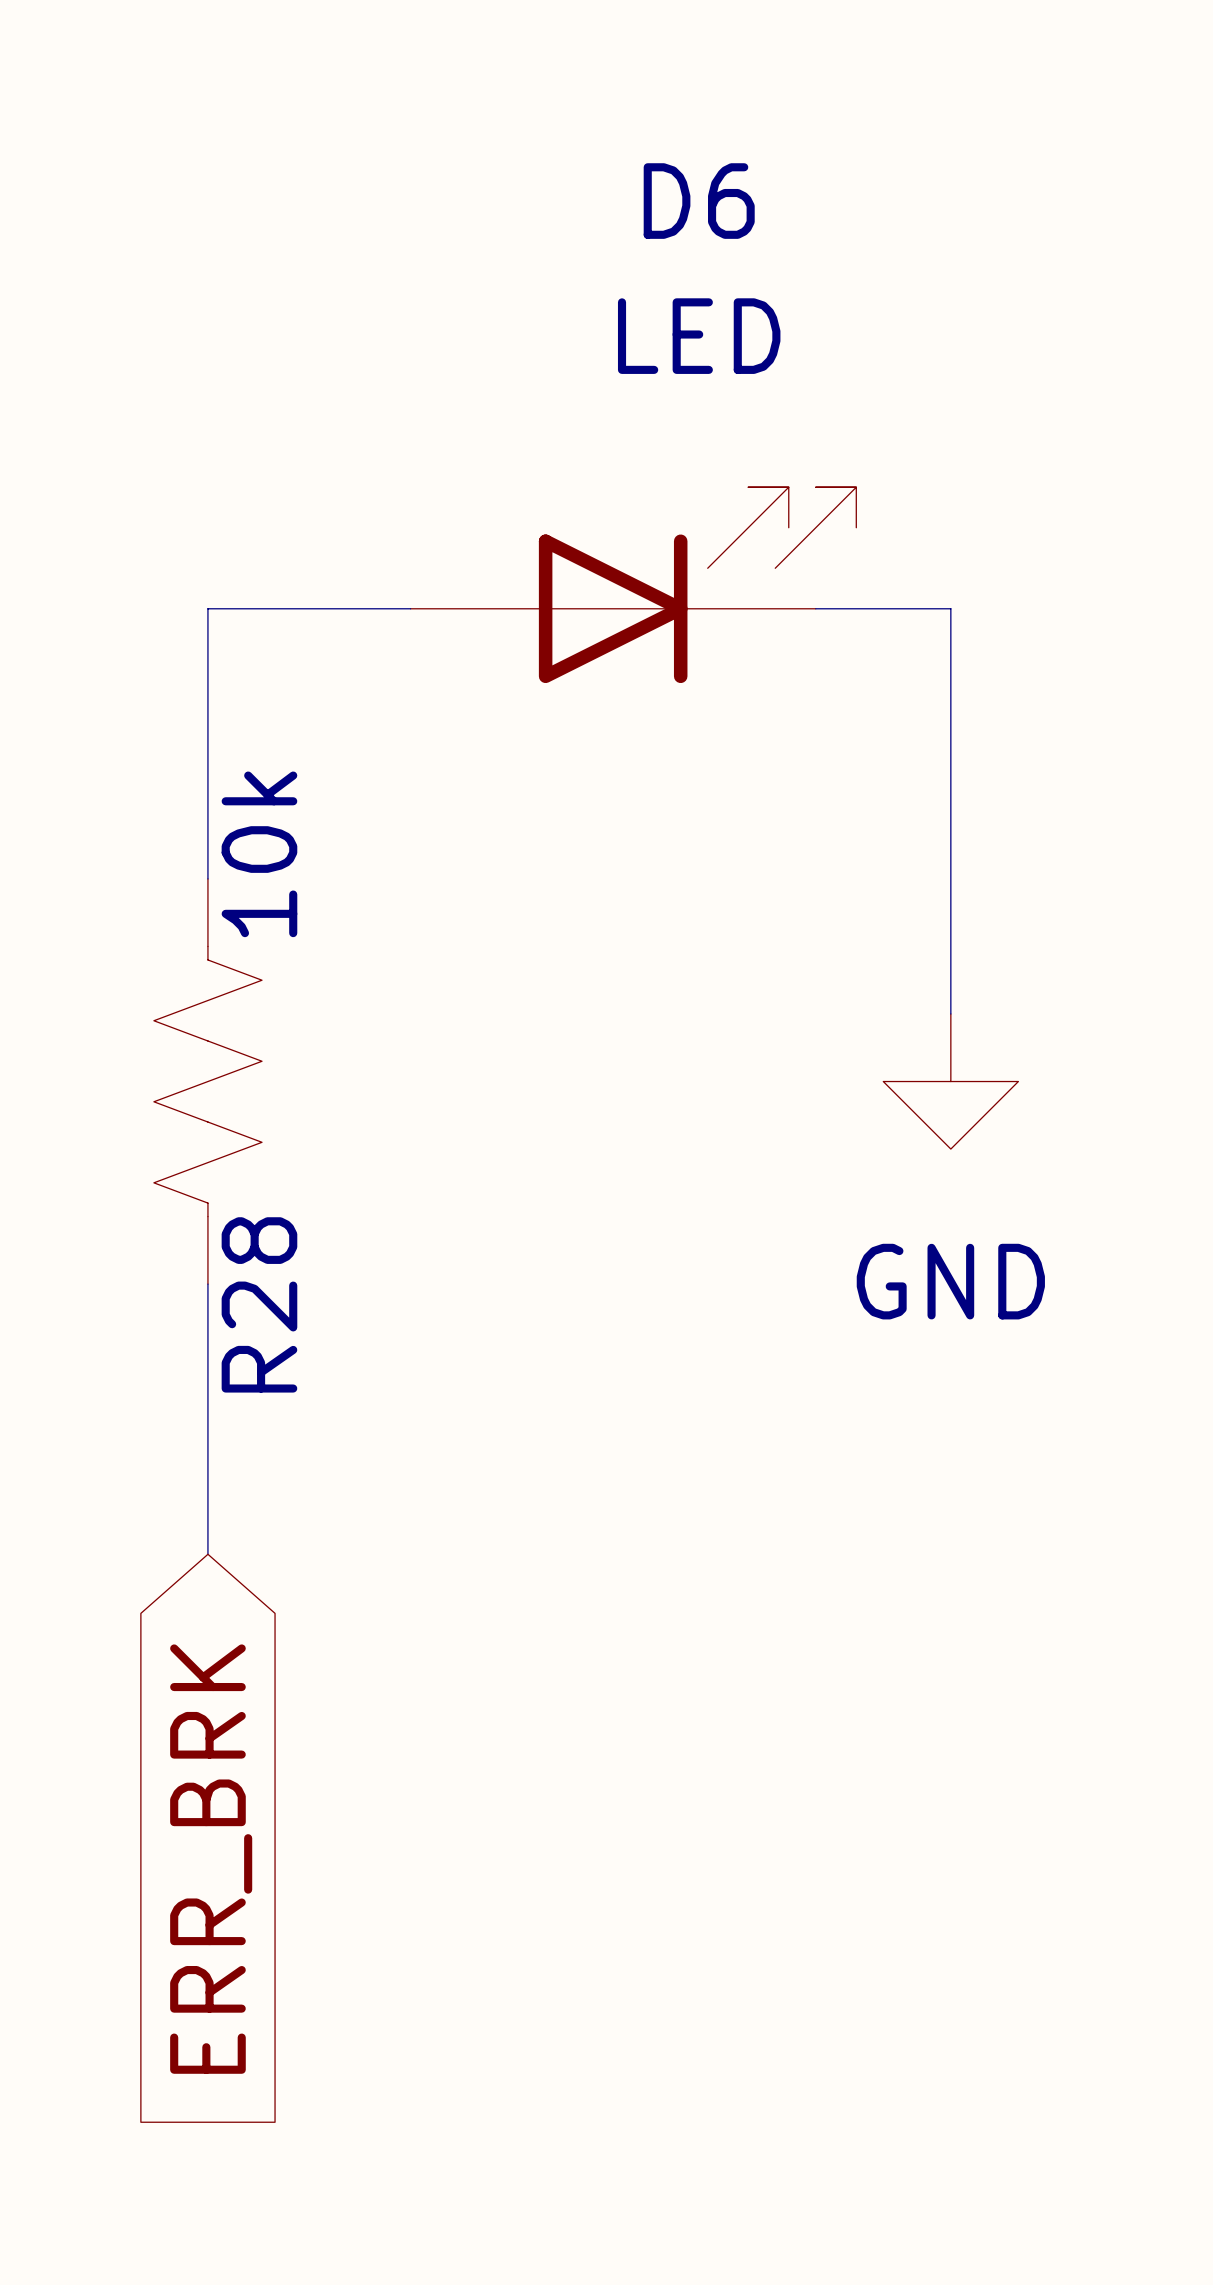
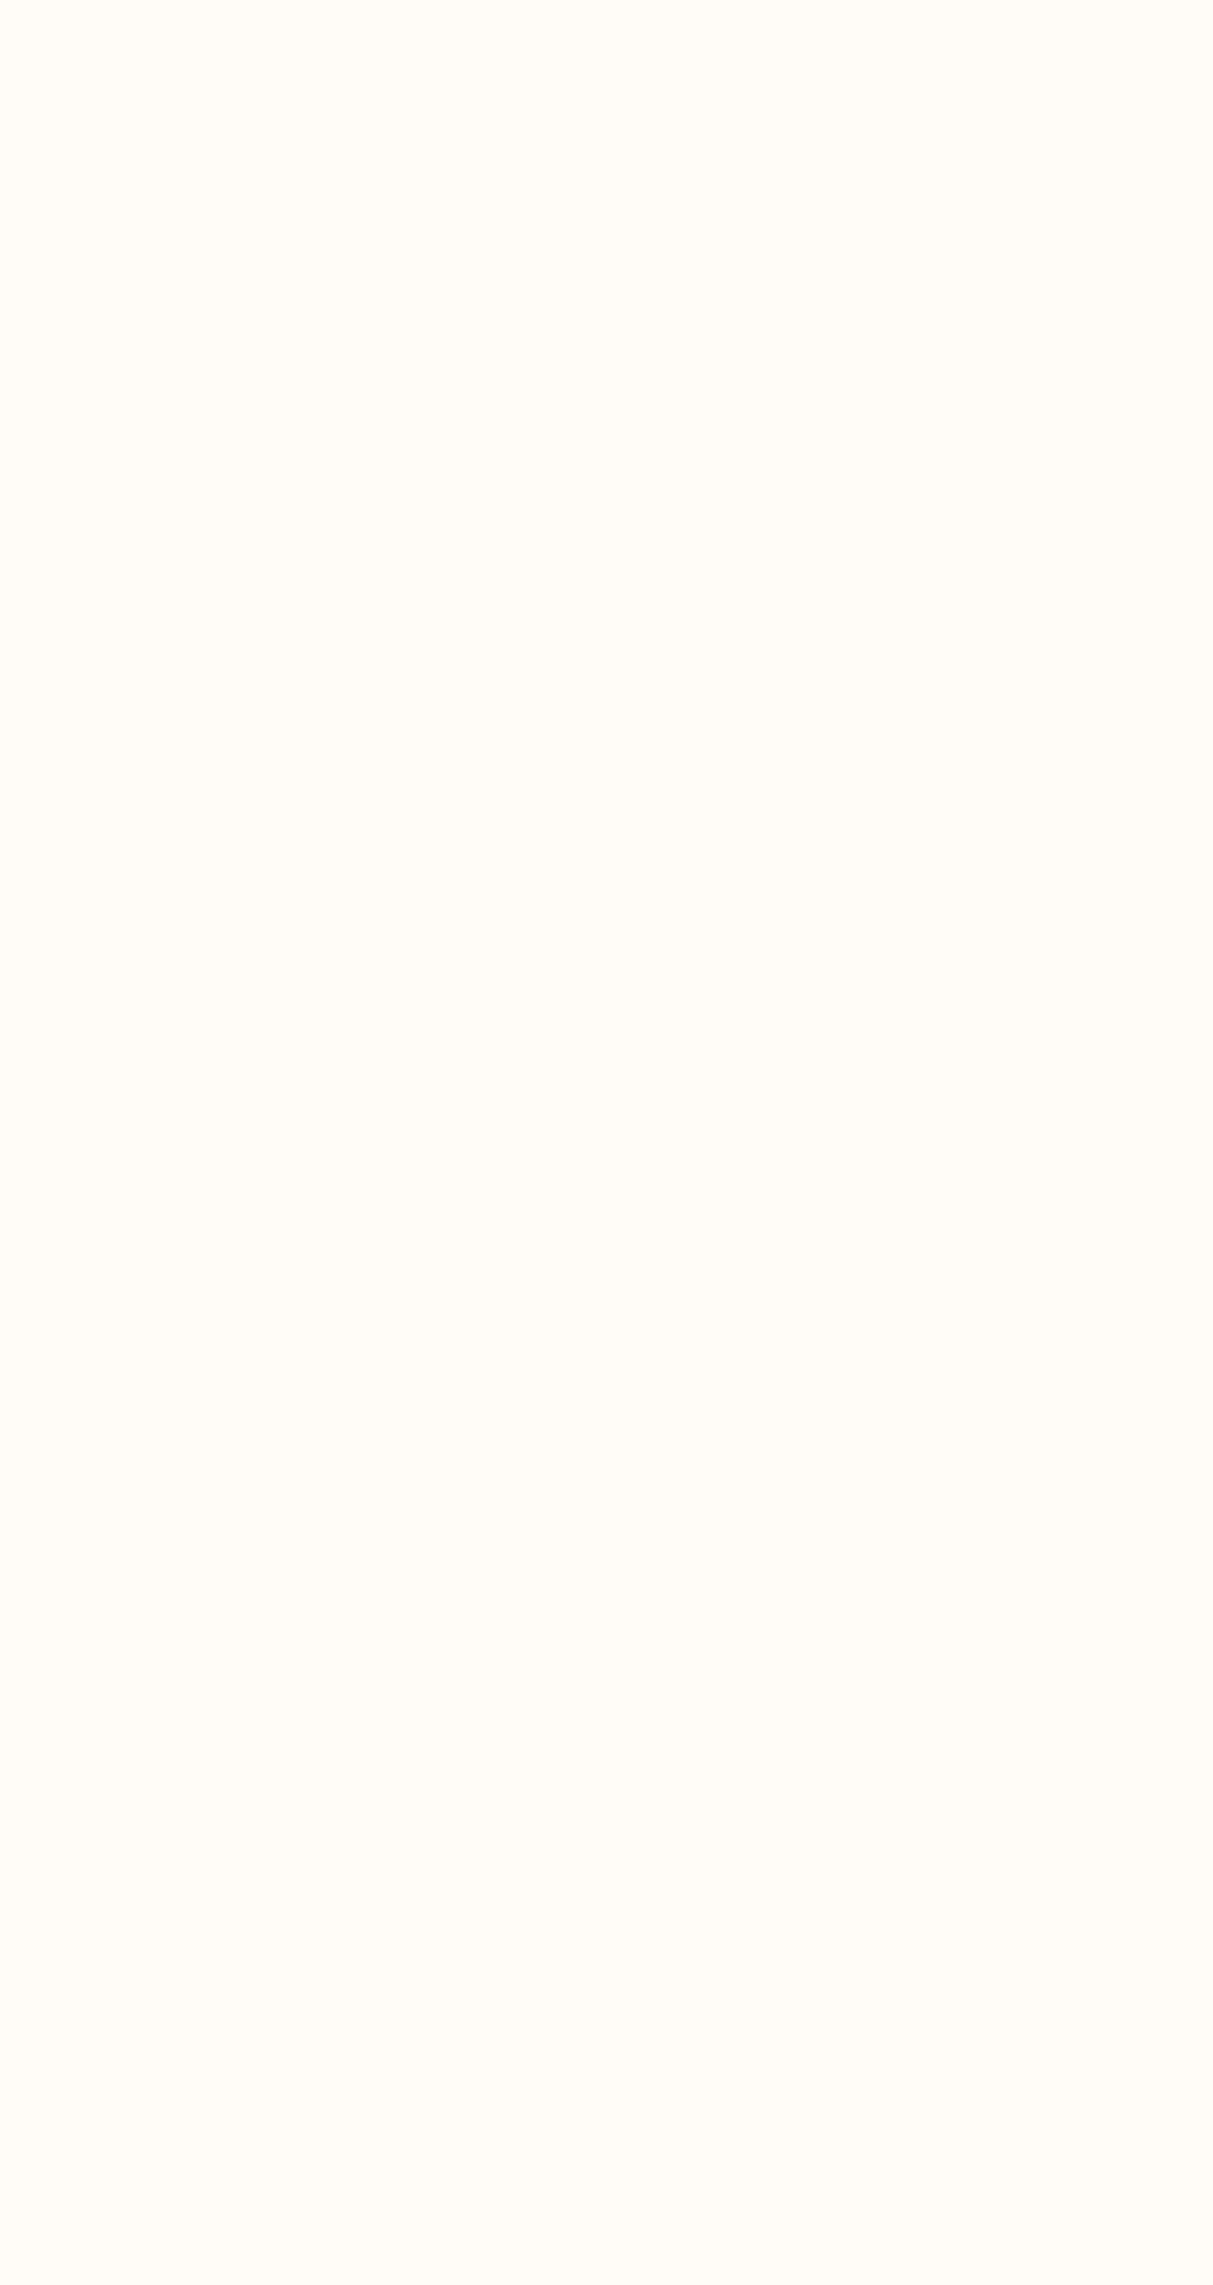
D6: LED (633, 585) -> none
wire: (410, 608) (207, 608) (207, 878) -> none
wire: (815, 608) (950, 608) (950, 1013) -> none
R28: 10k (207, 1081) -> none
power symbol: GND (950, 1081) -> none
wire: (207, 1284) (207, 1554) -> none
global label: ERR_BRK (211, 1859) -> none

